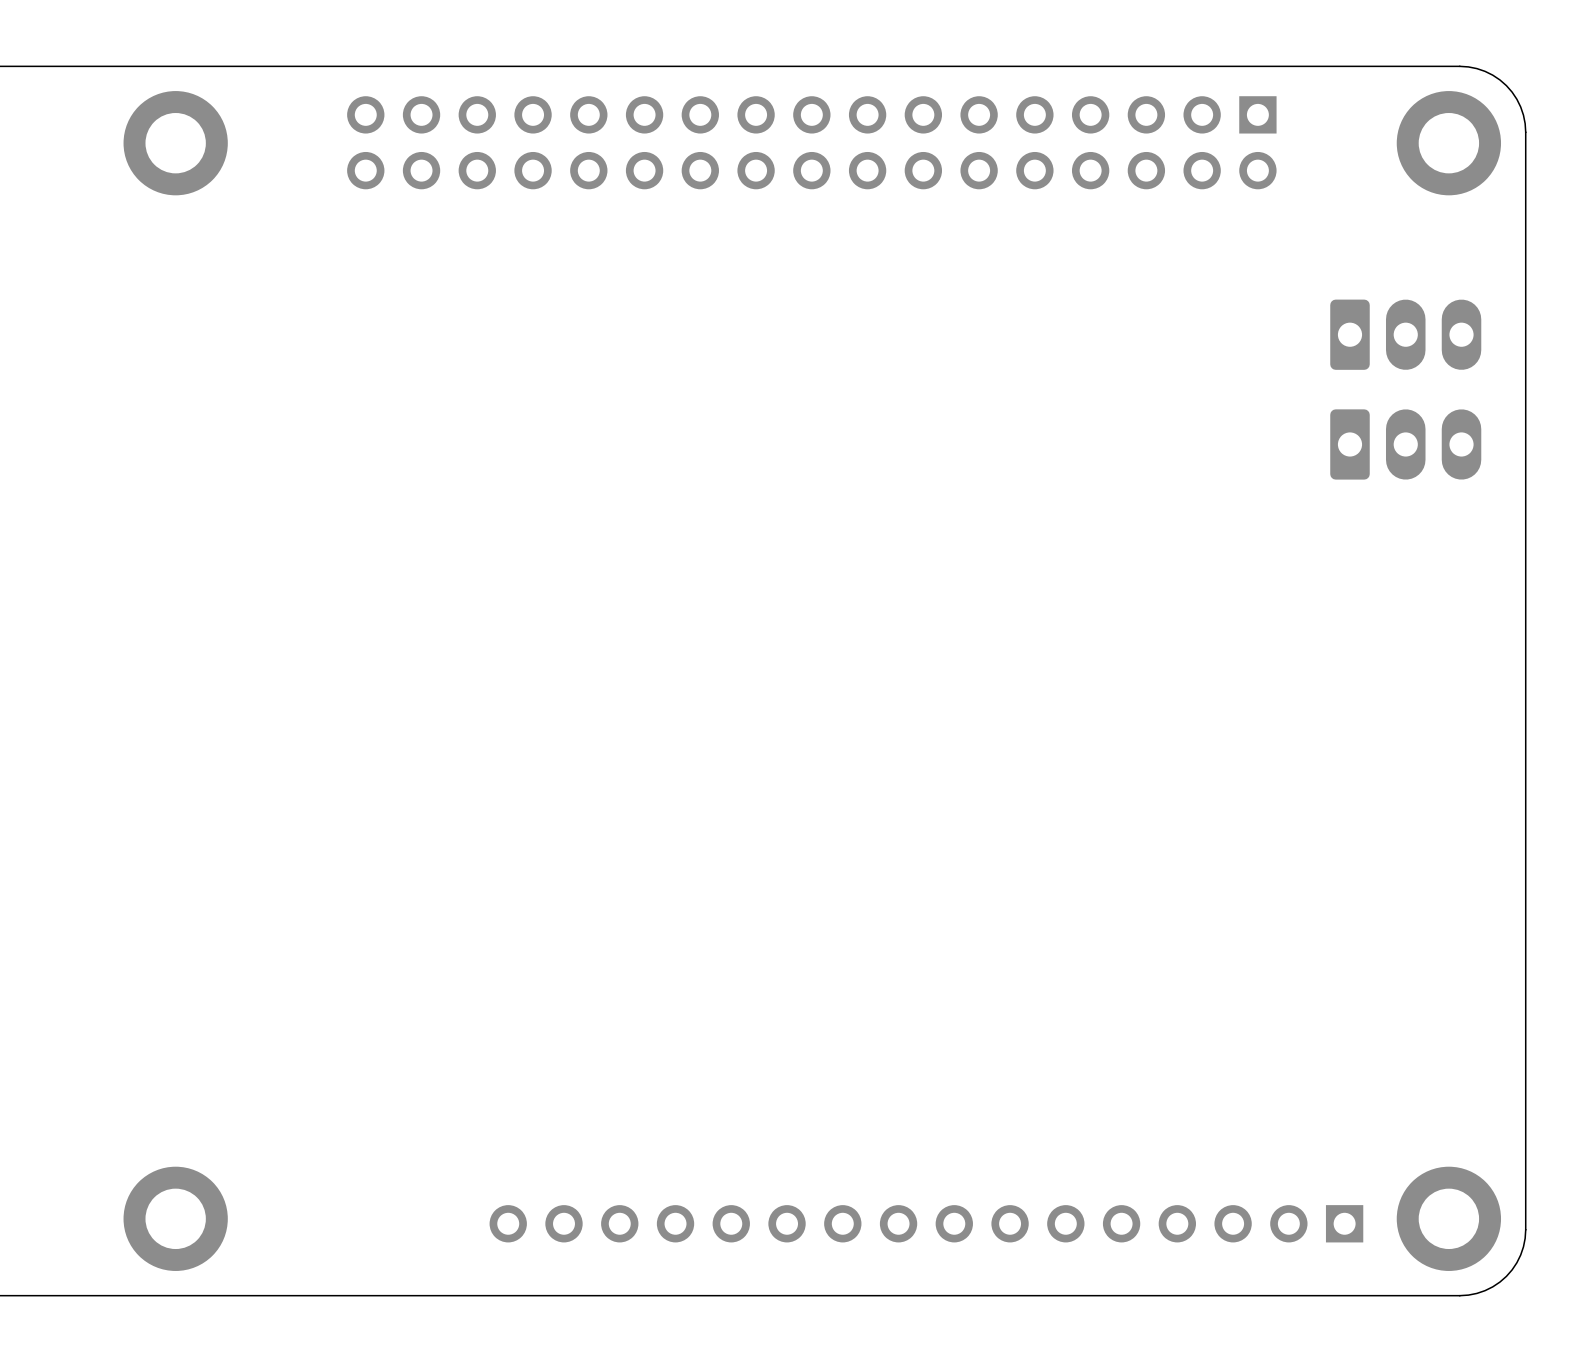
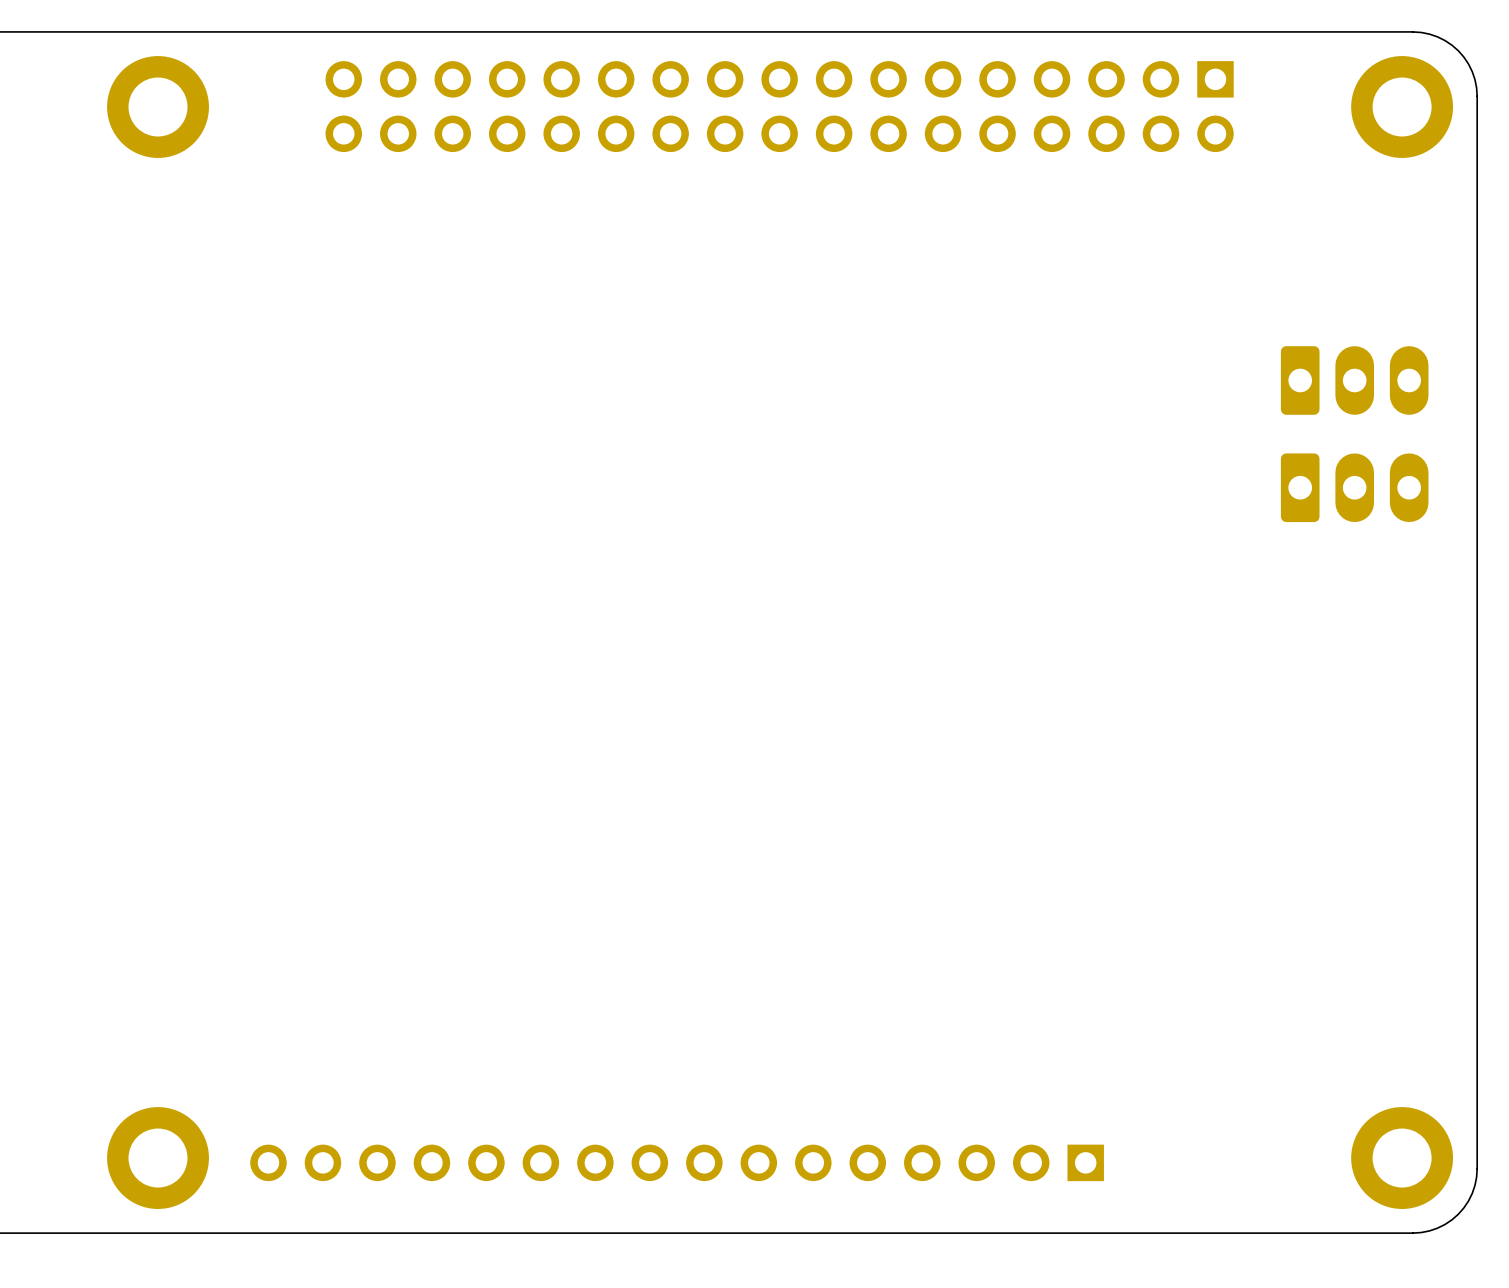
part position: (1405, 389) -> (1354, 434)
part position: (926, 1223) -> (677, 1162)

